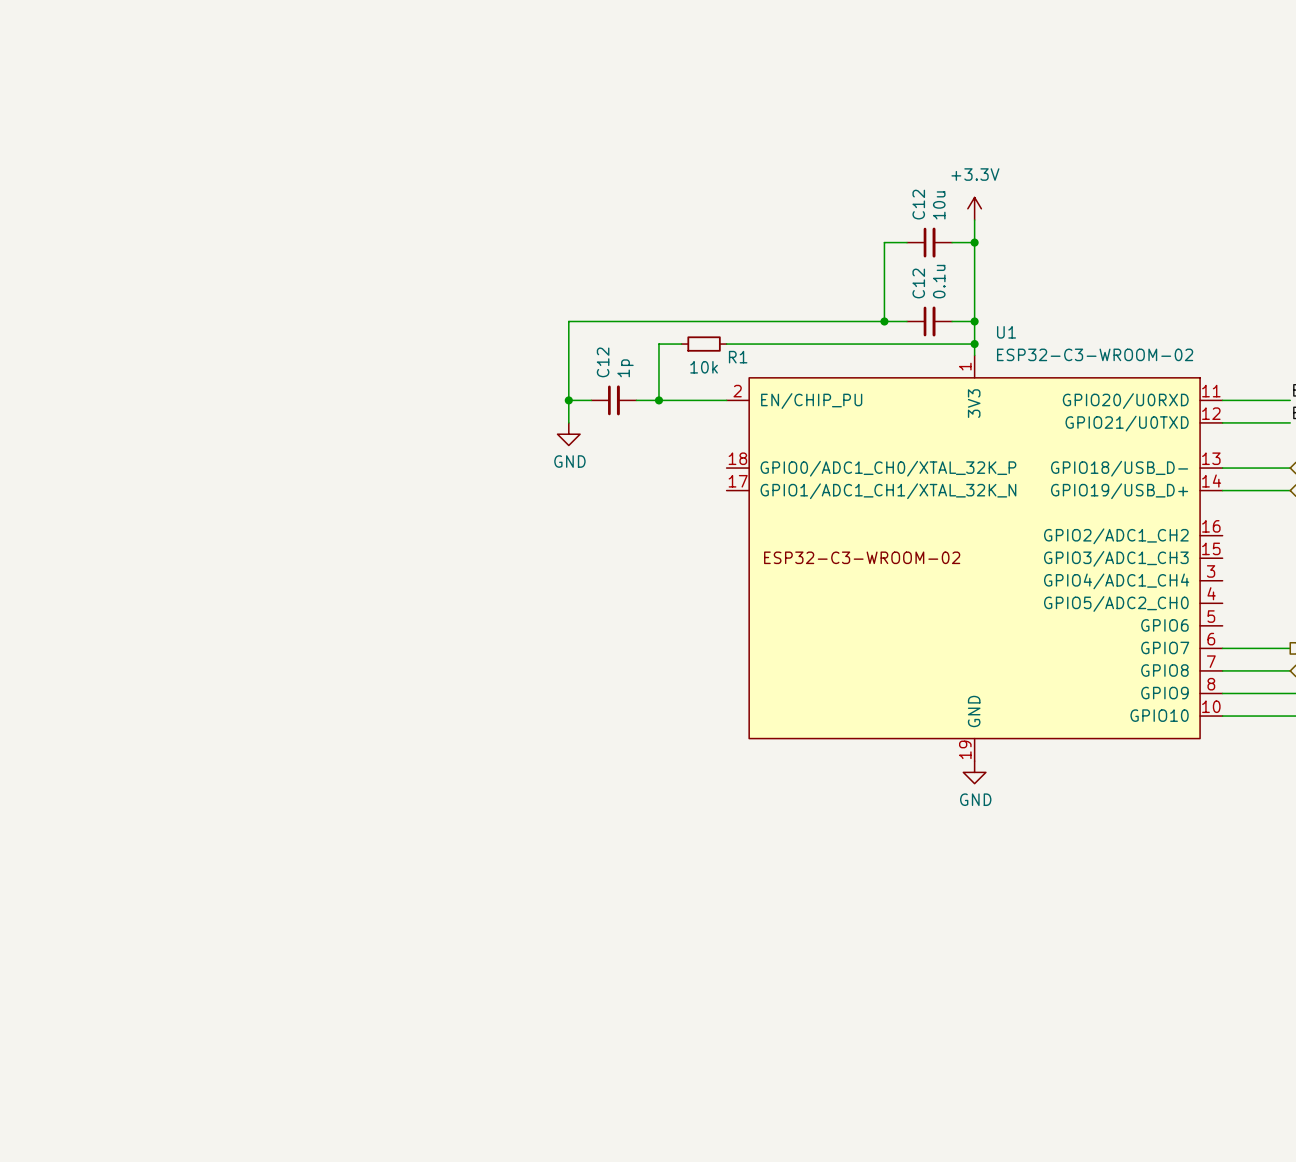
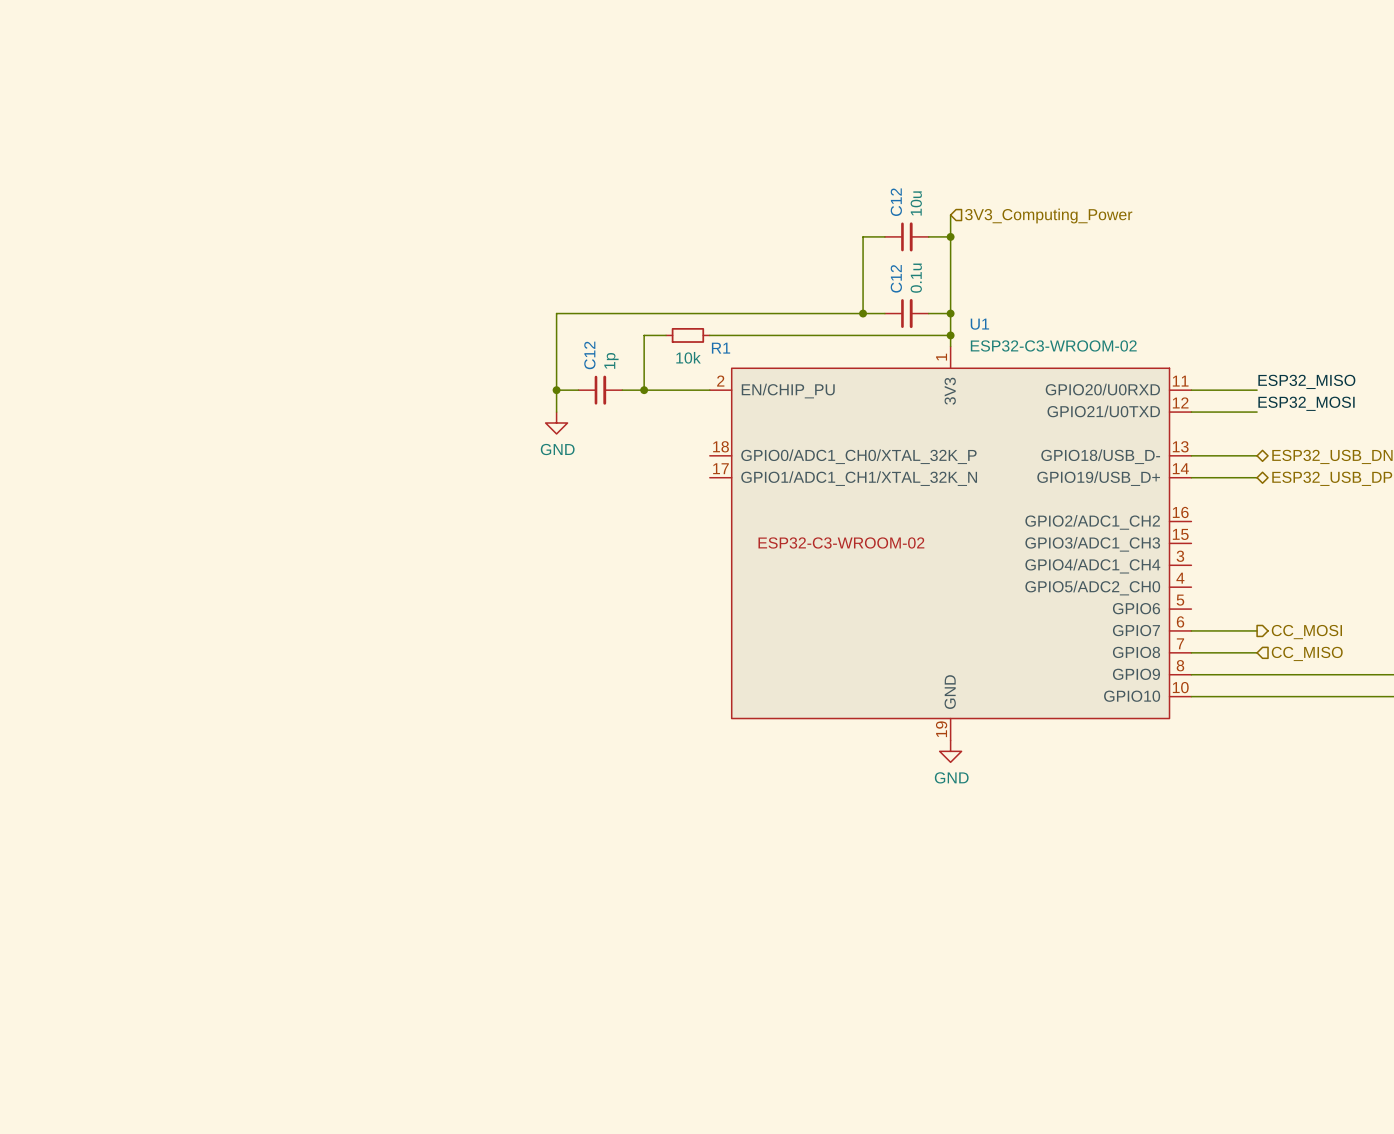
power symbol: +3.3V (974, 208) -> none
hierarchical label: none -> 3V3_Computing_Power (1048, 215)

